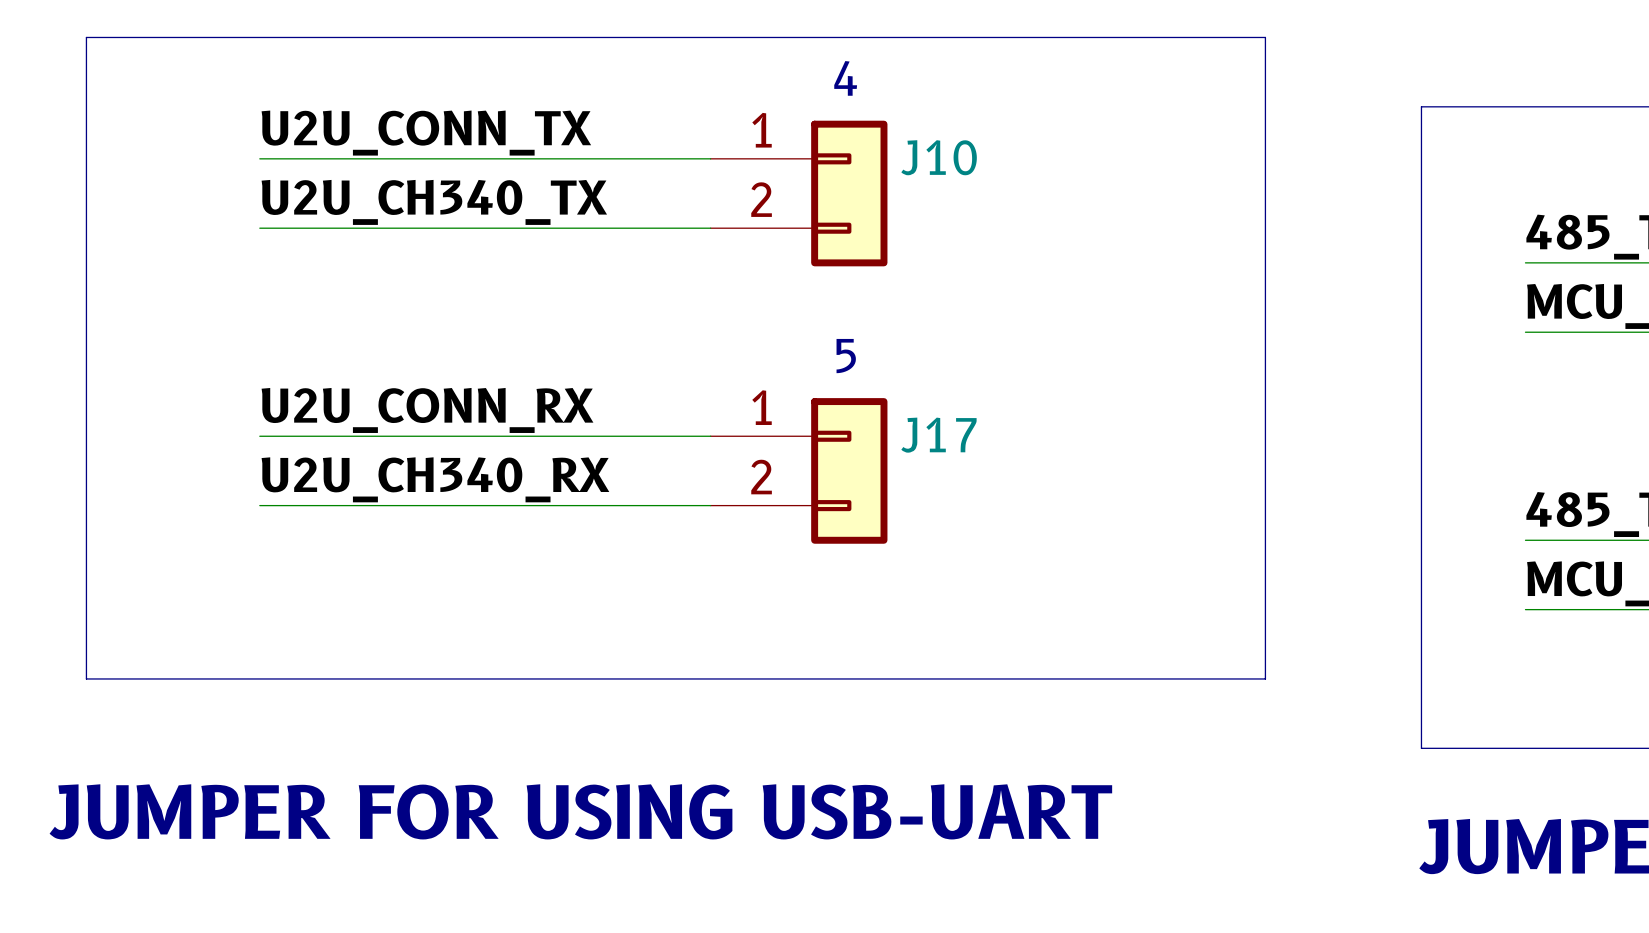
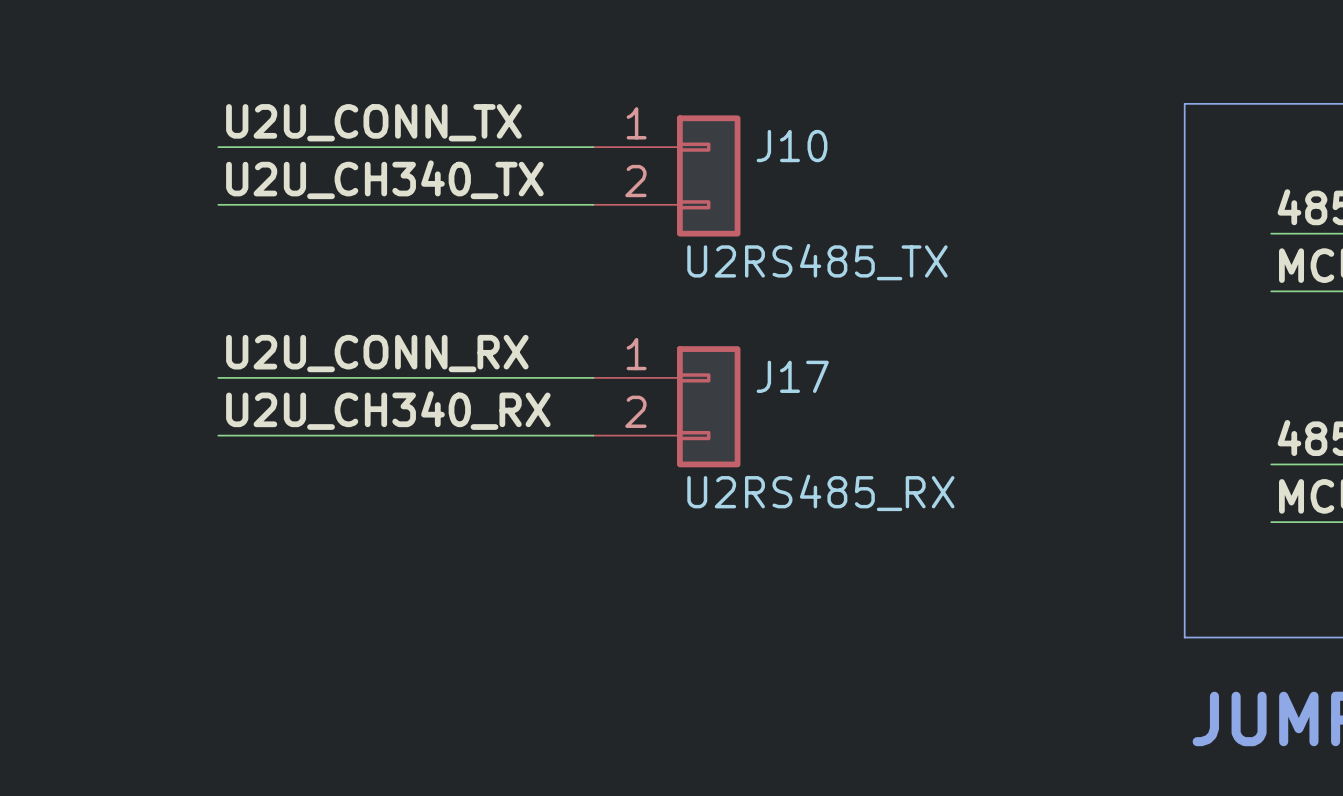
bus: (86, 37) (1265, 37) (1265, 678) (86, 678) (86, 37) -> none
text: 4 (845, 78) -> none
J10 value: none -> U2RS485_TX (817, 262)
text: 5 (846, 356) -> none
J17 value: none -> U2RS485_RX (820, 492)
text: JUMPER FOR USING USB-UART (580, 811) -> none

